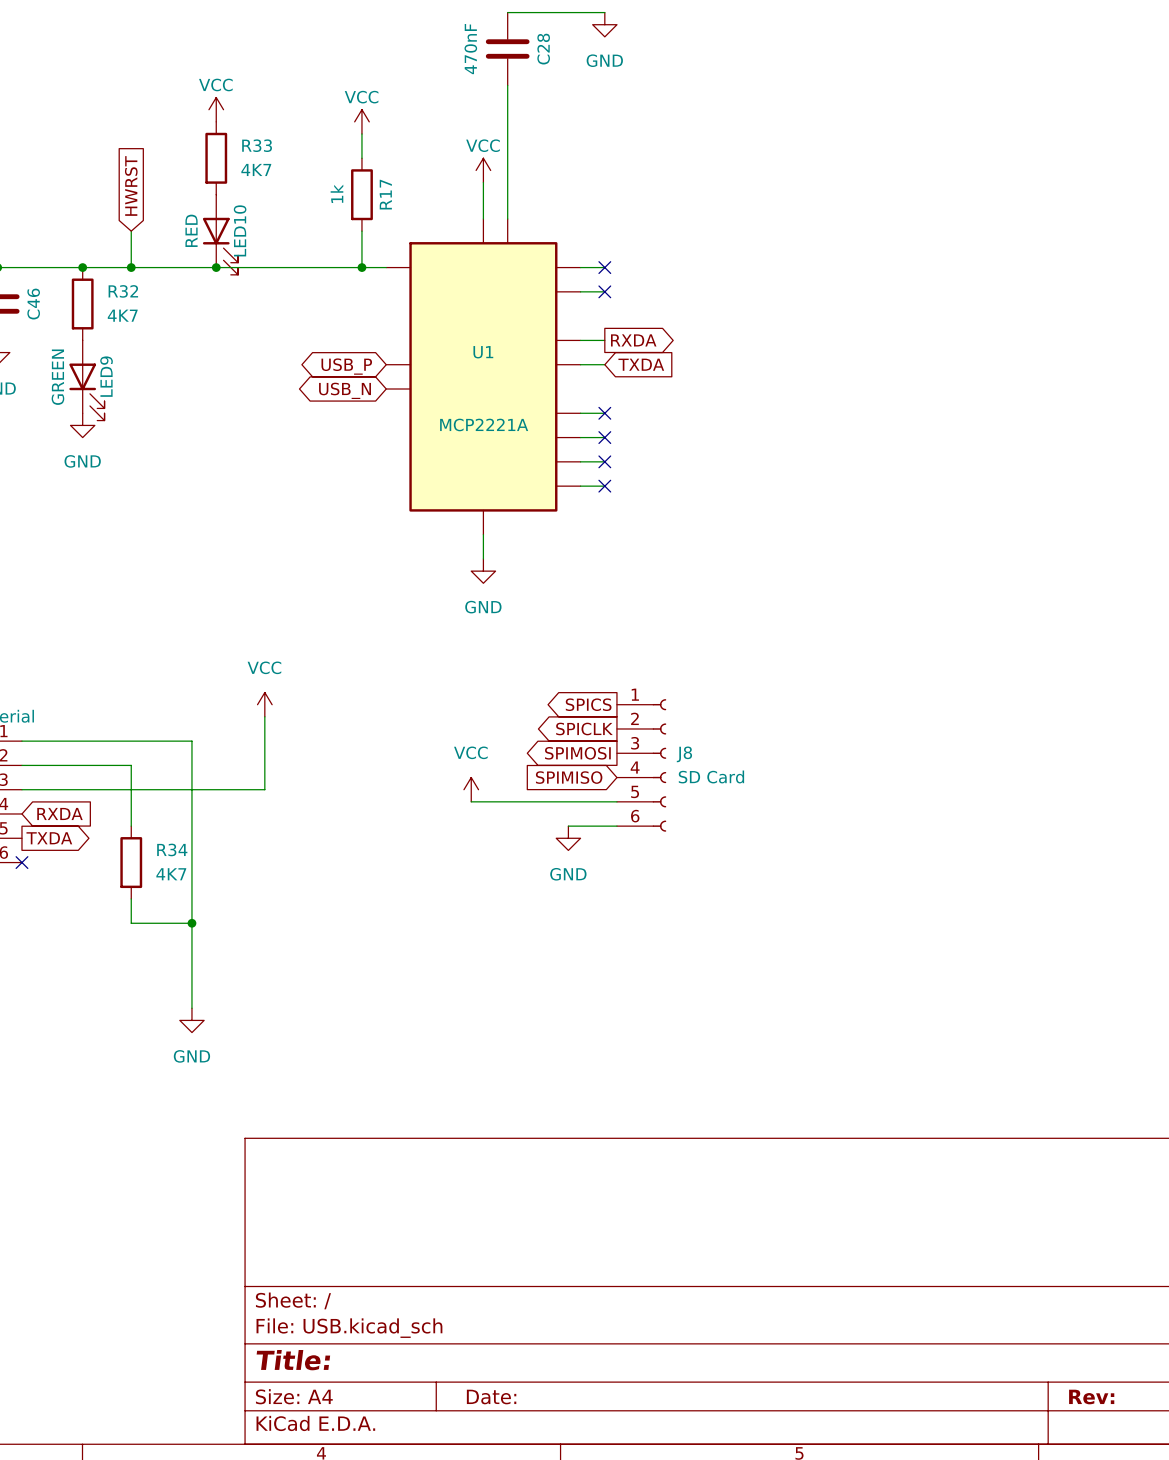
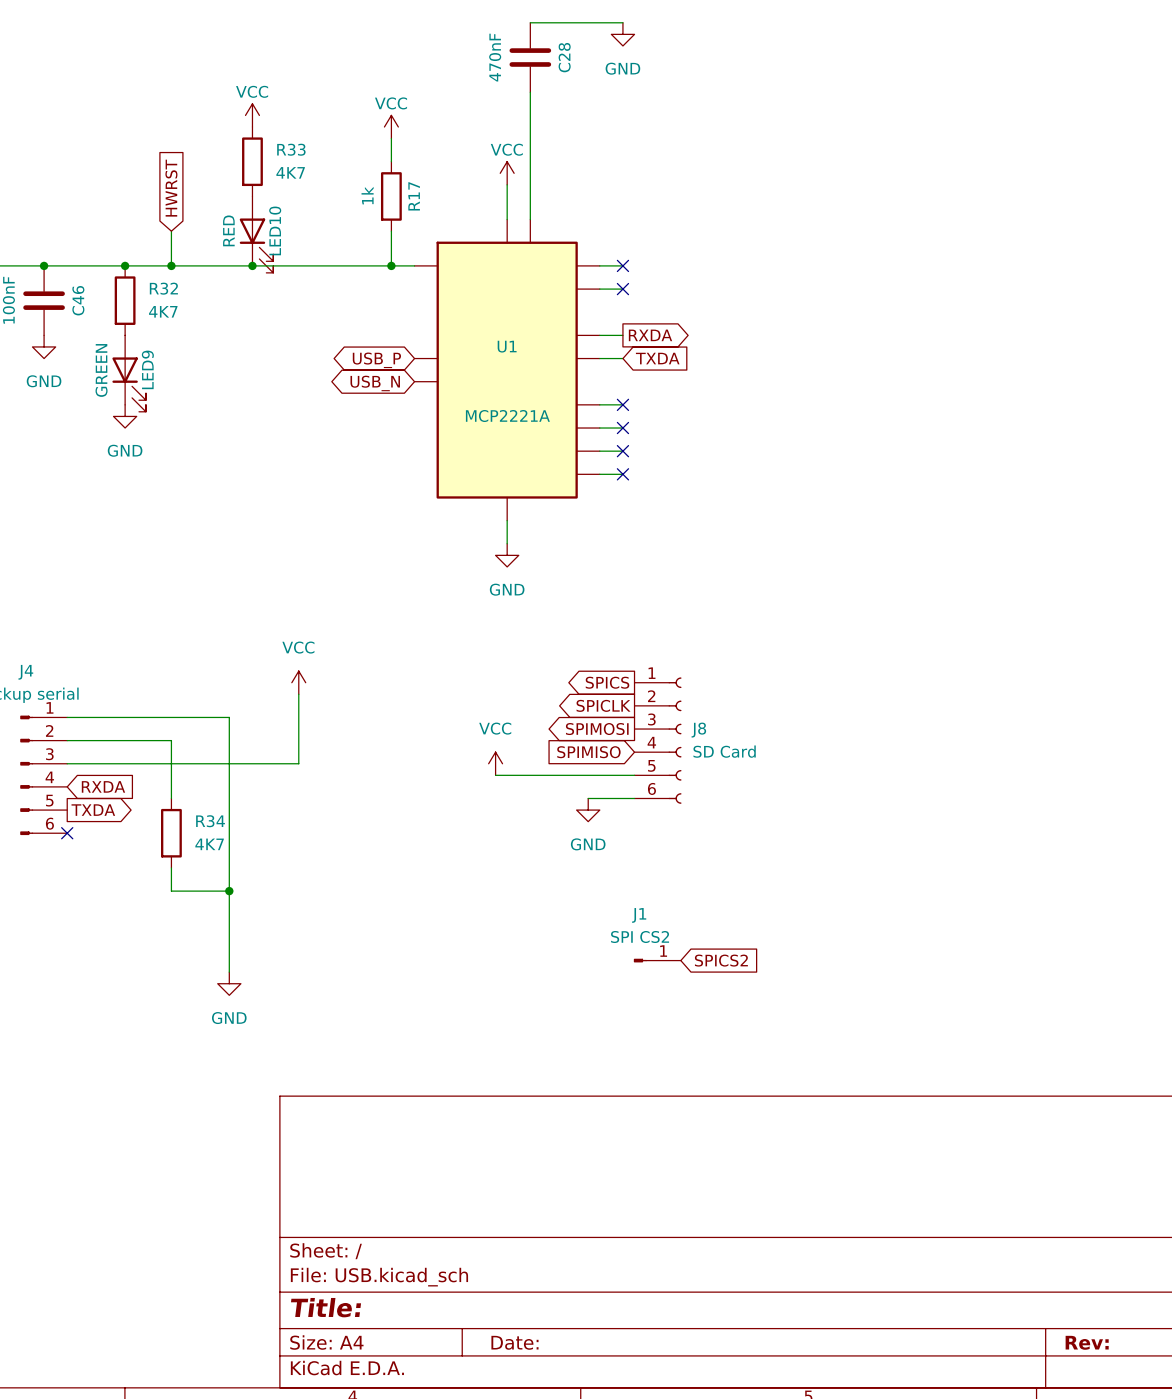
J1: none -> SPI CS2 (657, 960)
global label: none -> SPICS2 (721, 960)

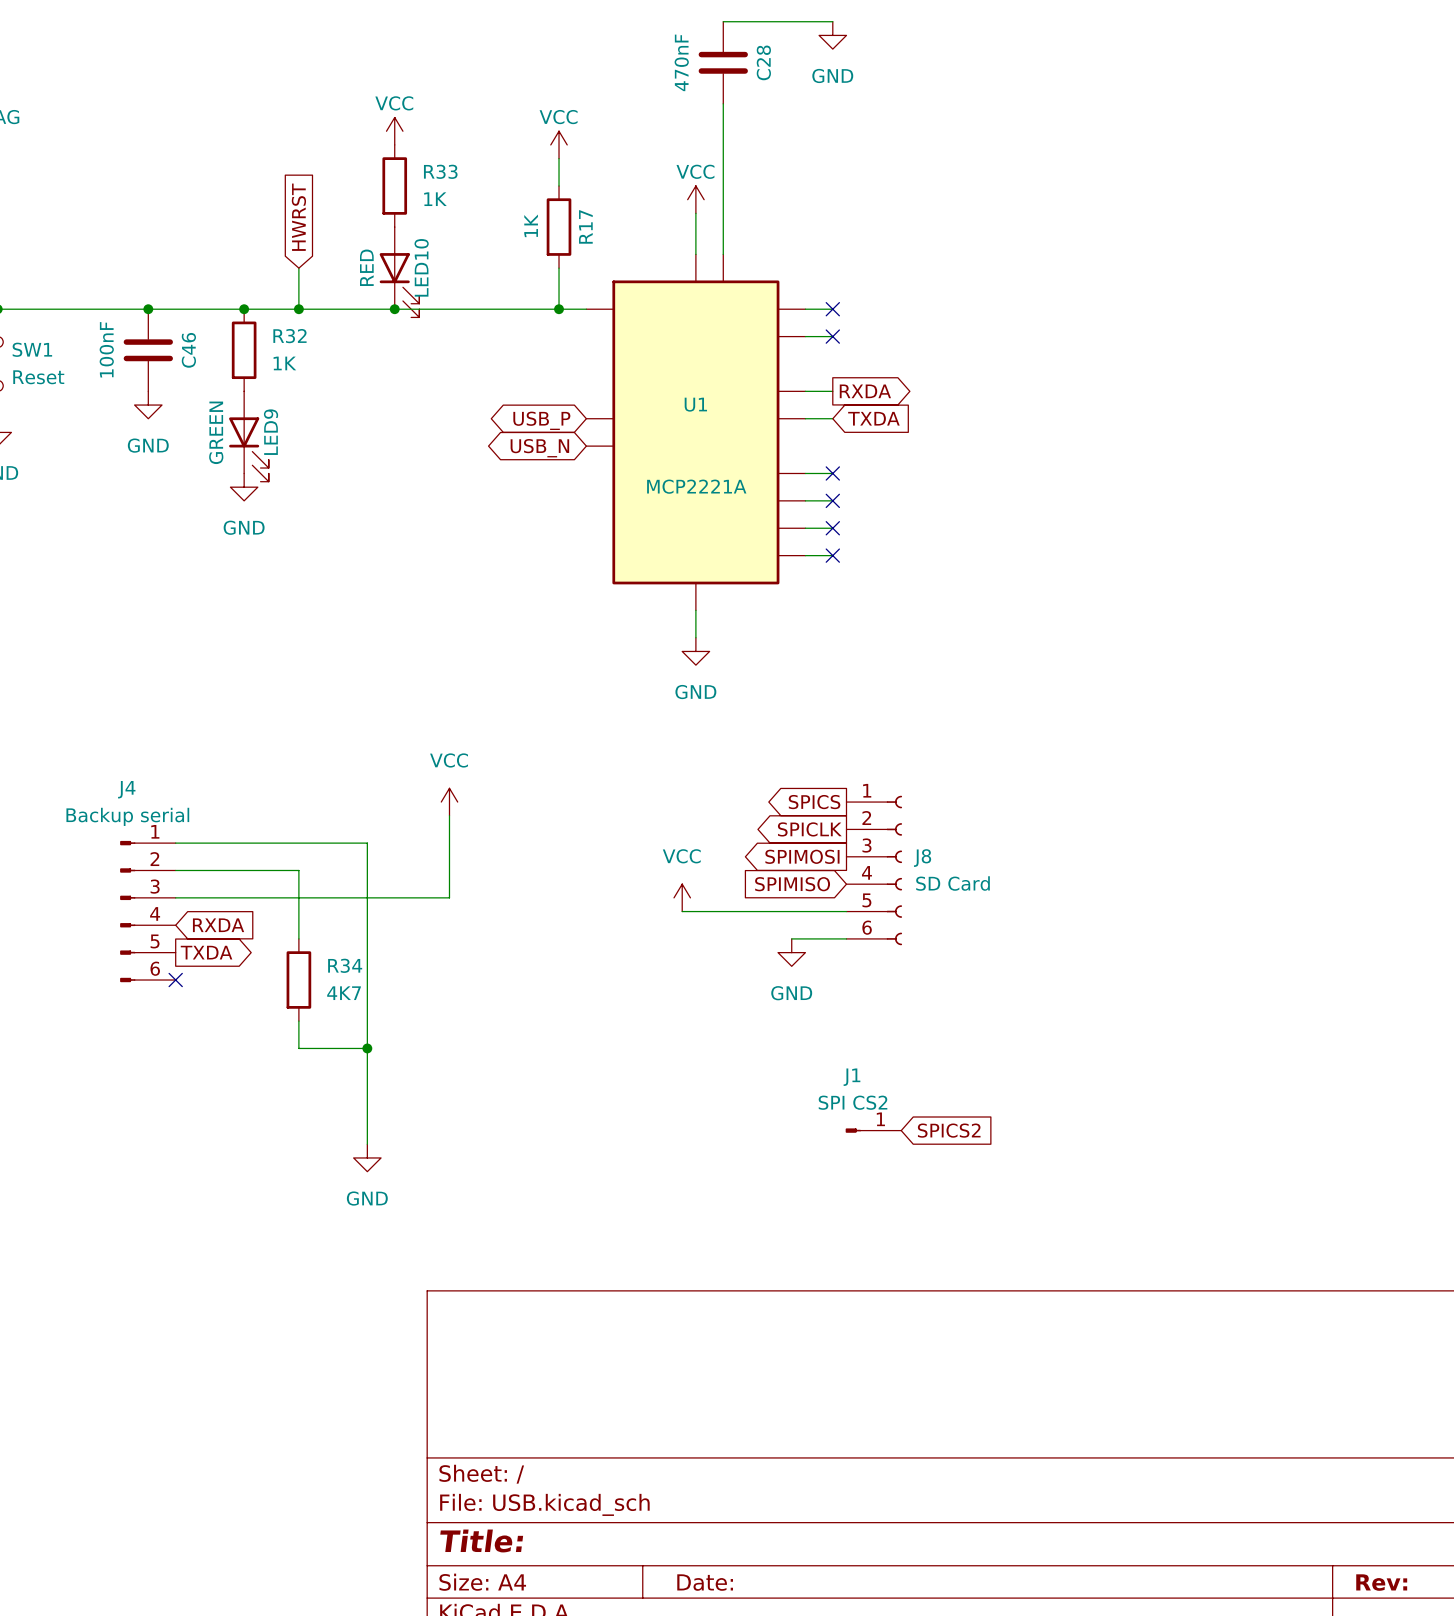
R33 value: 4K7 (290, 172) -> 1K (435, 199)
R17 value: 1k (367, 195) -> 1K (531, 225)
R32 value: 4K7 (163, 311) -> 1K (284, 363)

